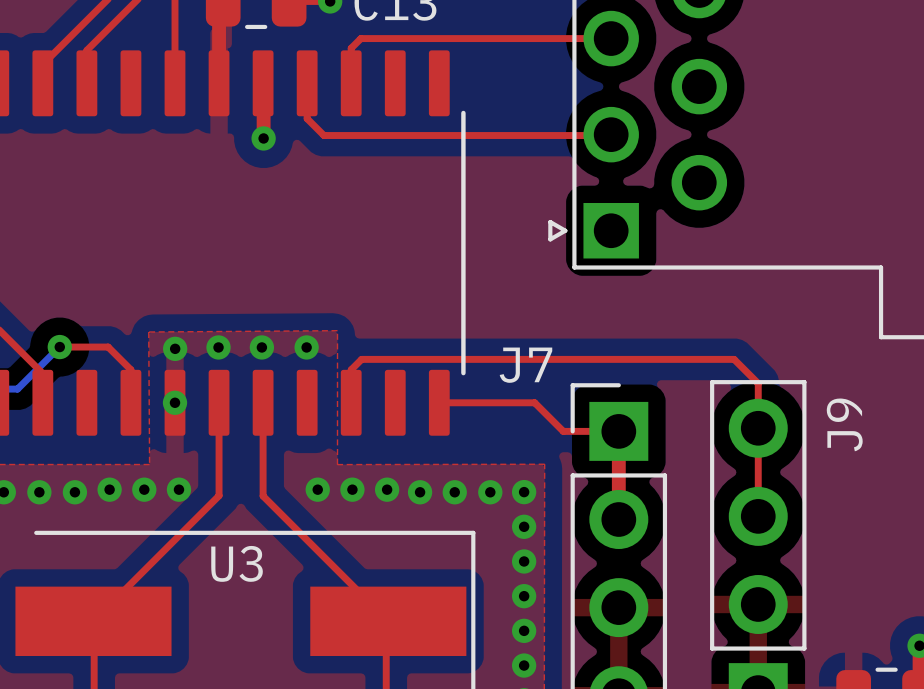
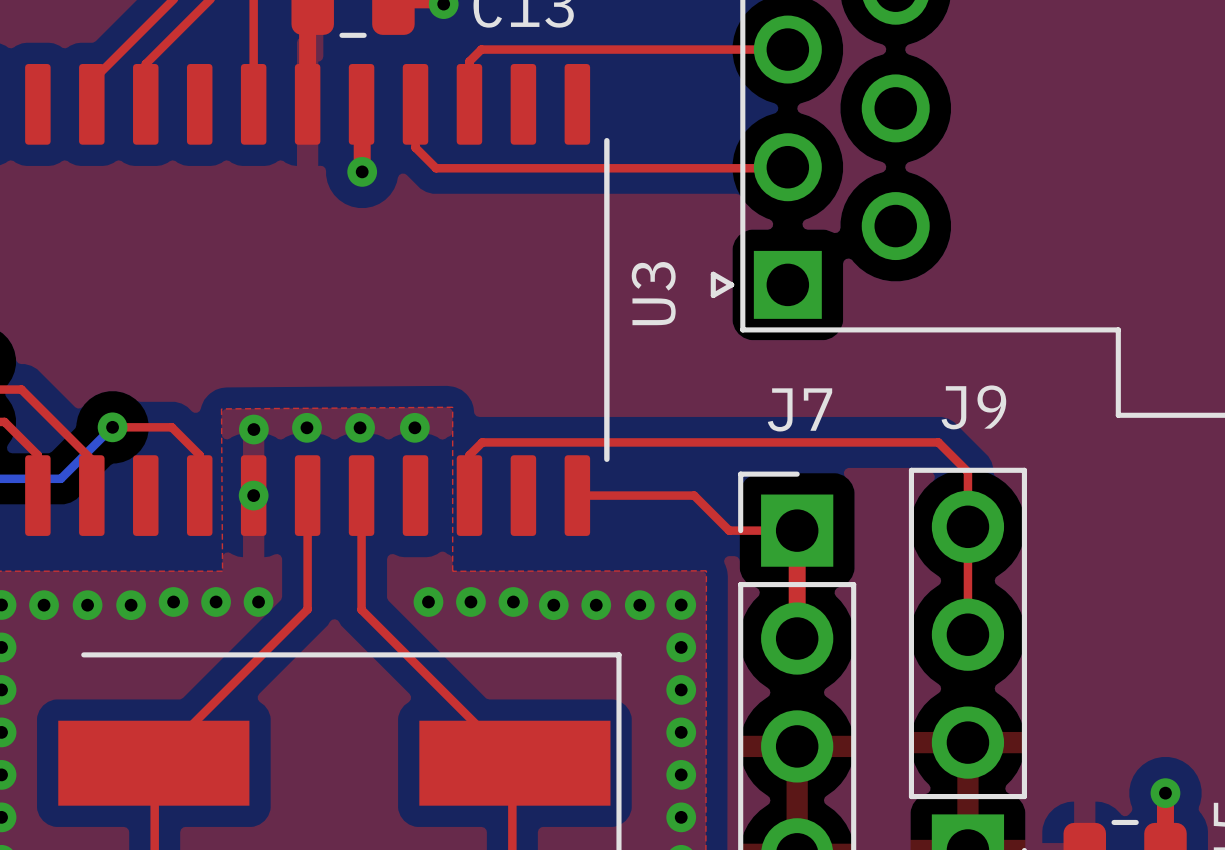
J7 name position: J7 (525, 365) -> J7 (800, 409)
J9 name rotation: 0° (844, 424) -> 90° clockwise (973, 407)
J9 name position: J9 (844, 424) -> J9 (973, 407)
U3 name rotation: 0° (237, 563) -> 90° counterclockwise (653, 293)
U3 name position: U3 (237, 563) -> U3 (653, 293)

